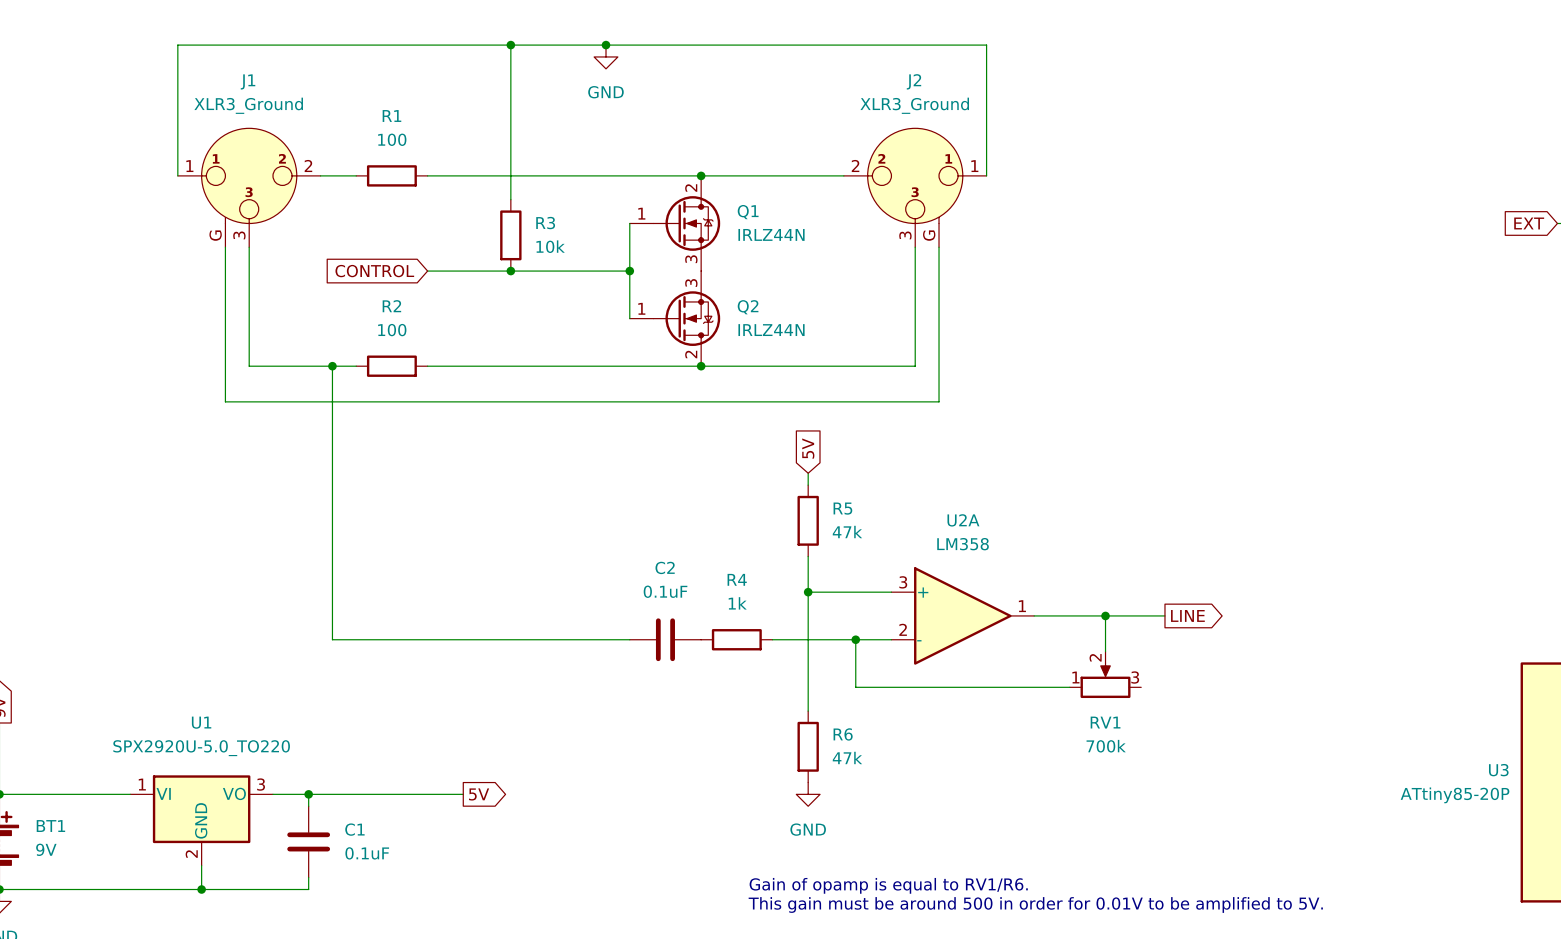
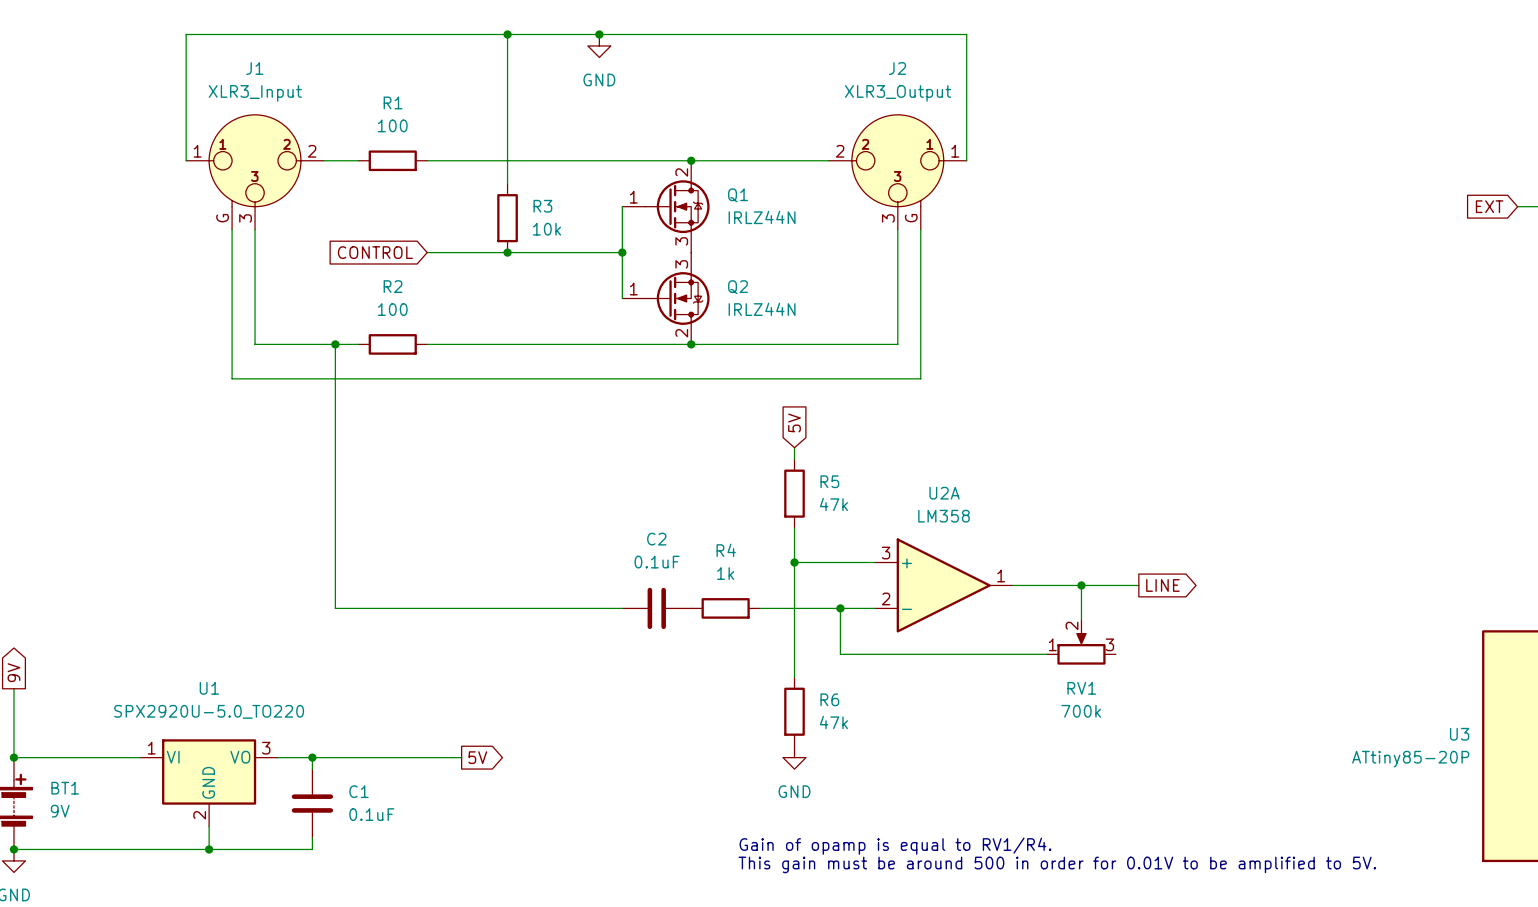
J1 value: XLR3_Ground (248, 105) -> XLR3_Input (255, 93)
J2 value: XLR3_Ground (914, 105) -> XLR3_Output (898, 93)
text: Gain of opamp is equal to RV1/R6. (888, 885) -> Gain of opamp is equal to RV1/R4. (895, 846)

